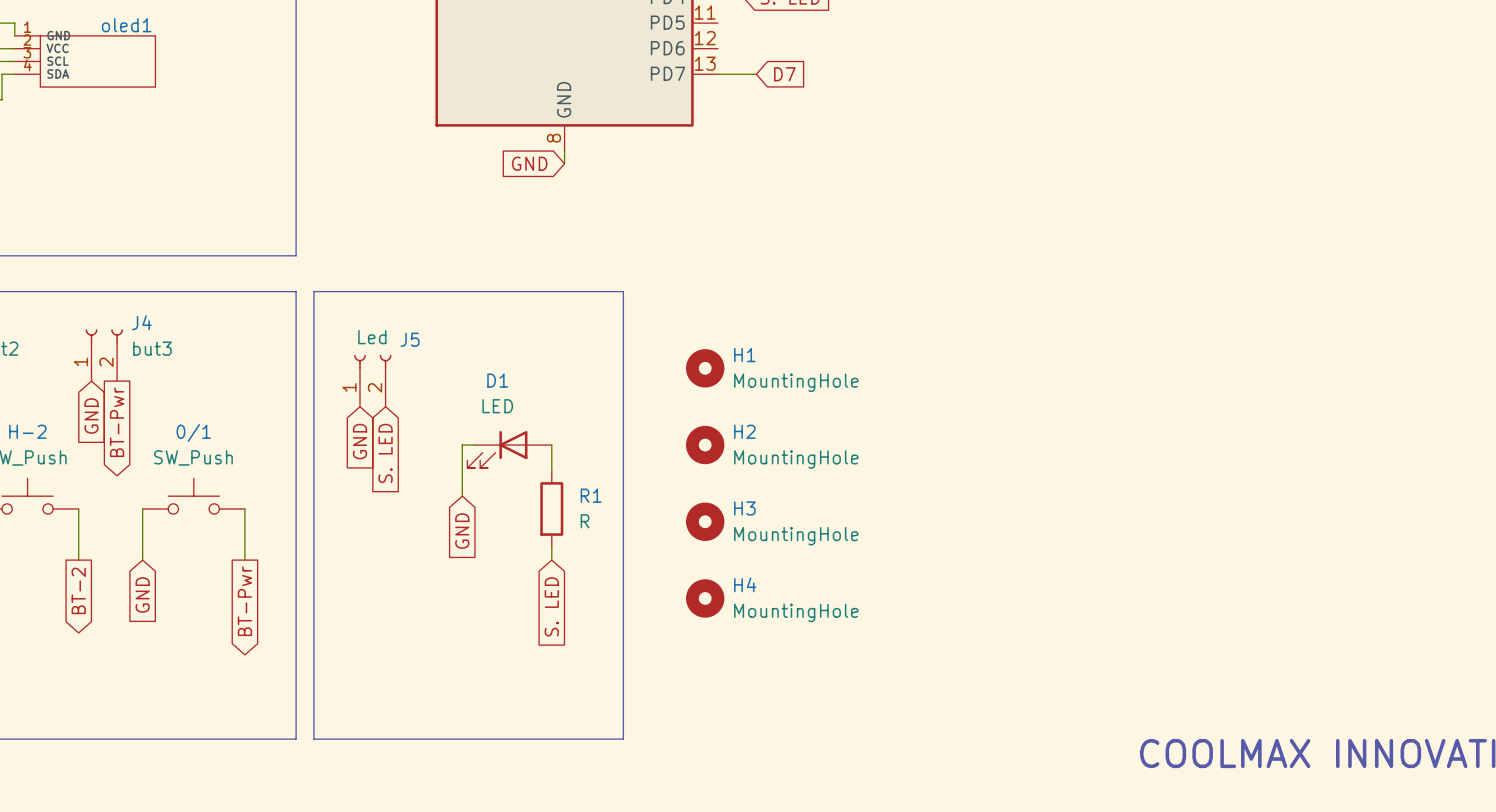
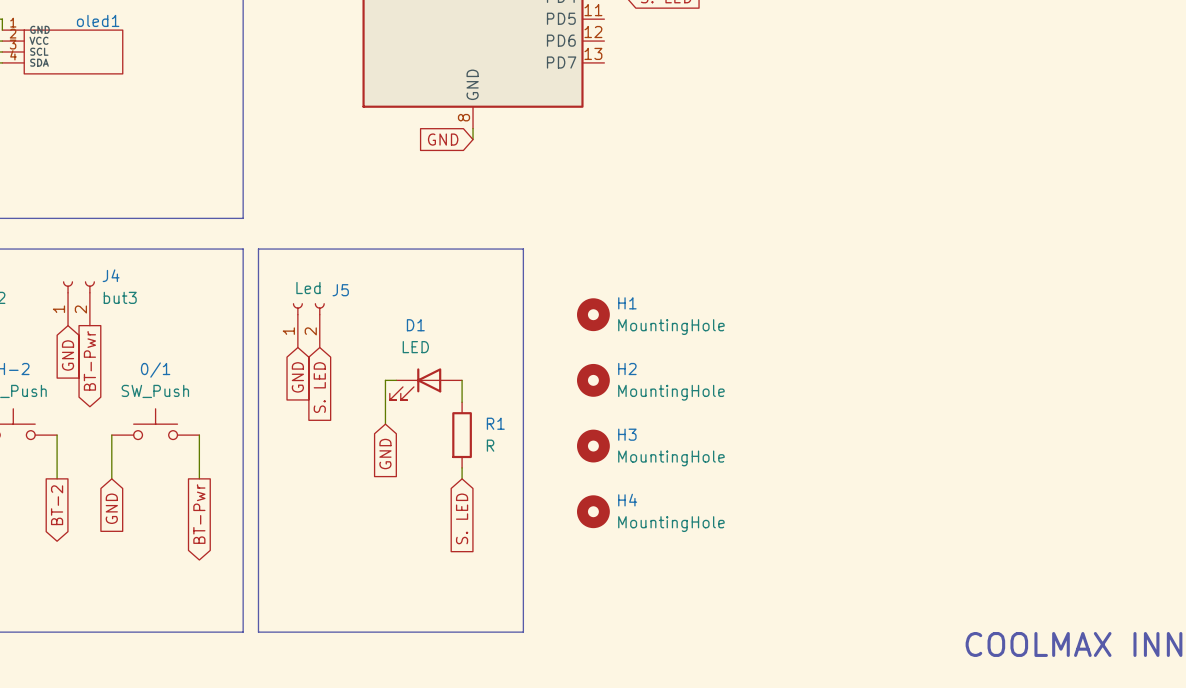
wire: (717, 74) (756, 74) -> none
global label: D7 (784, 74) -> none

